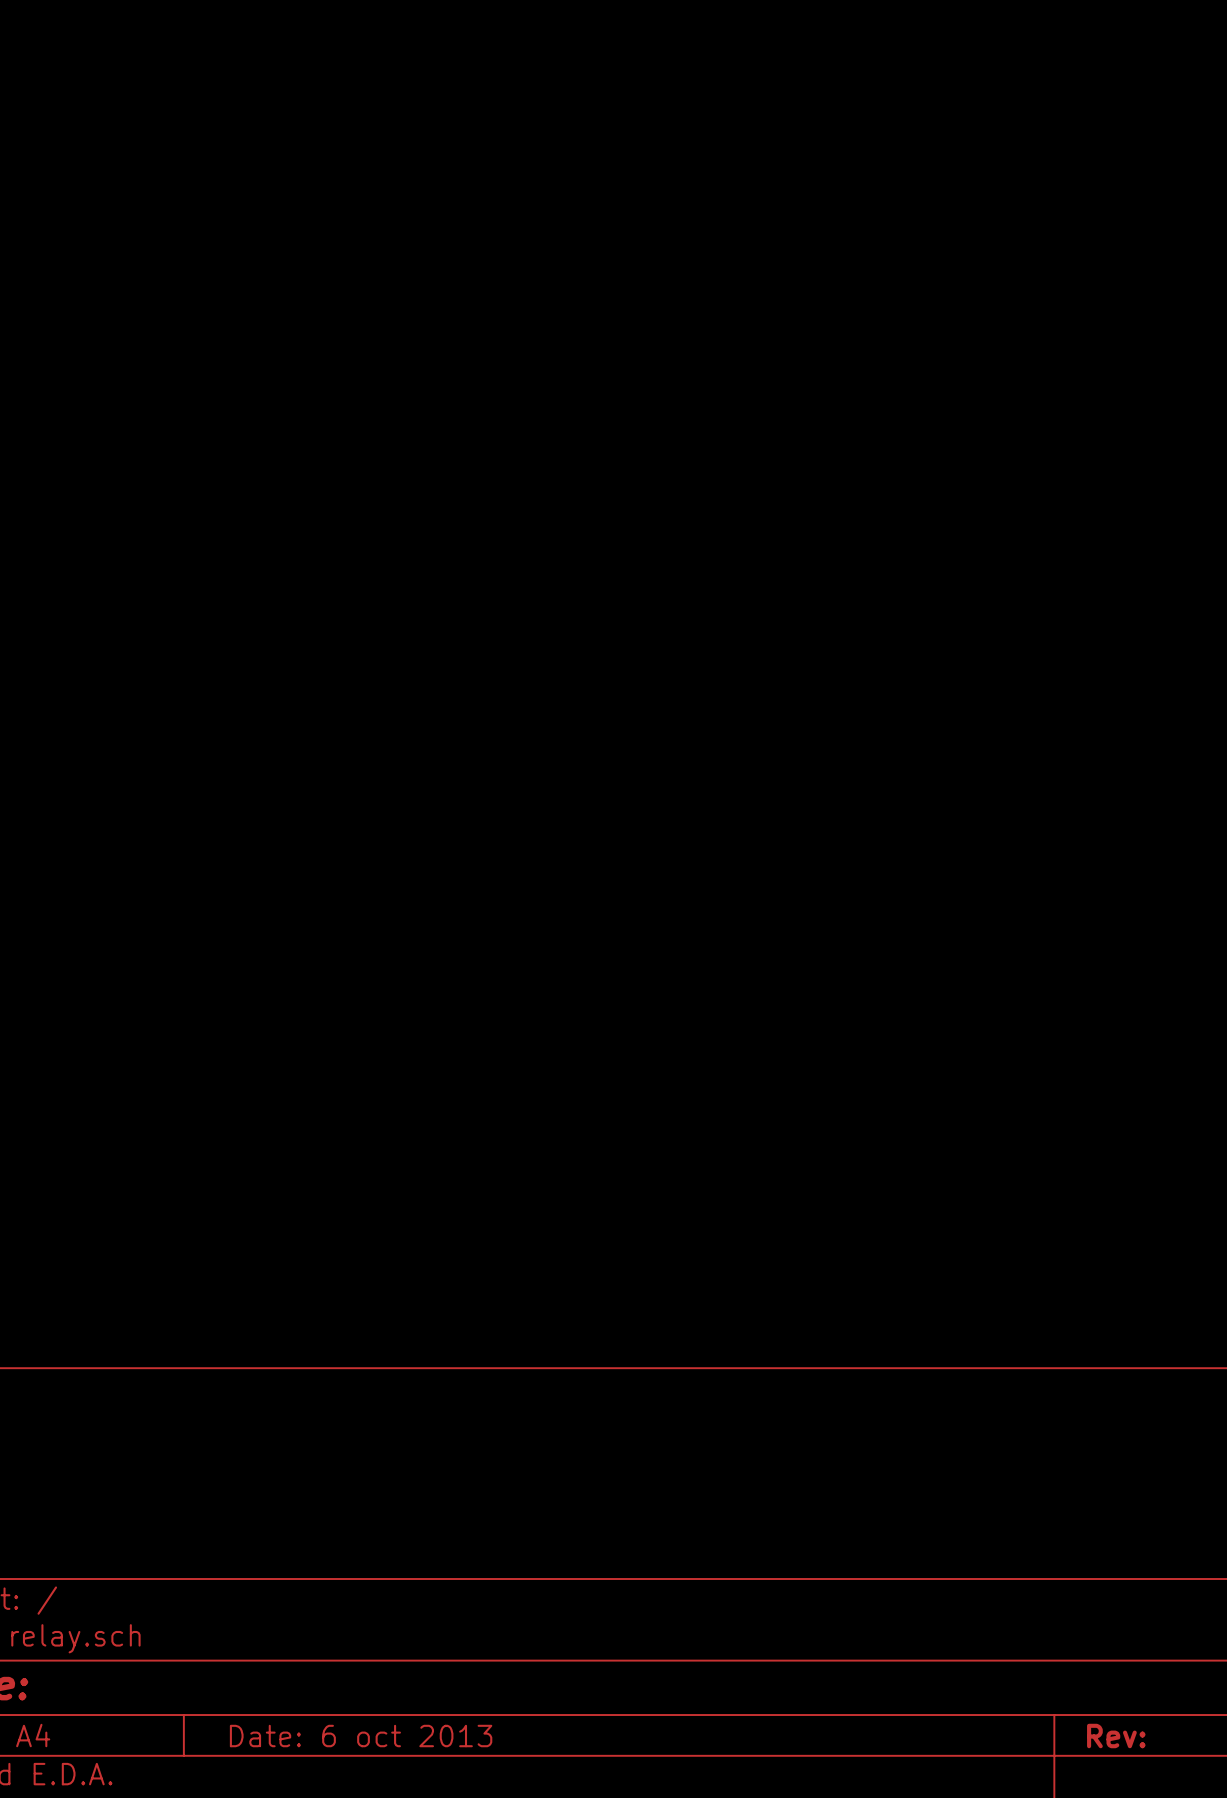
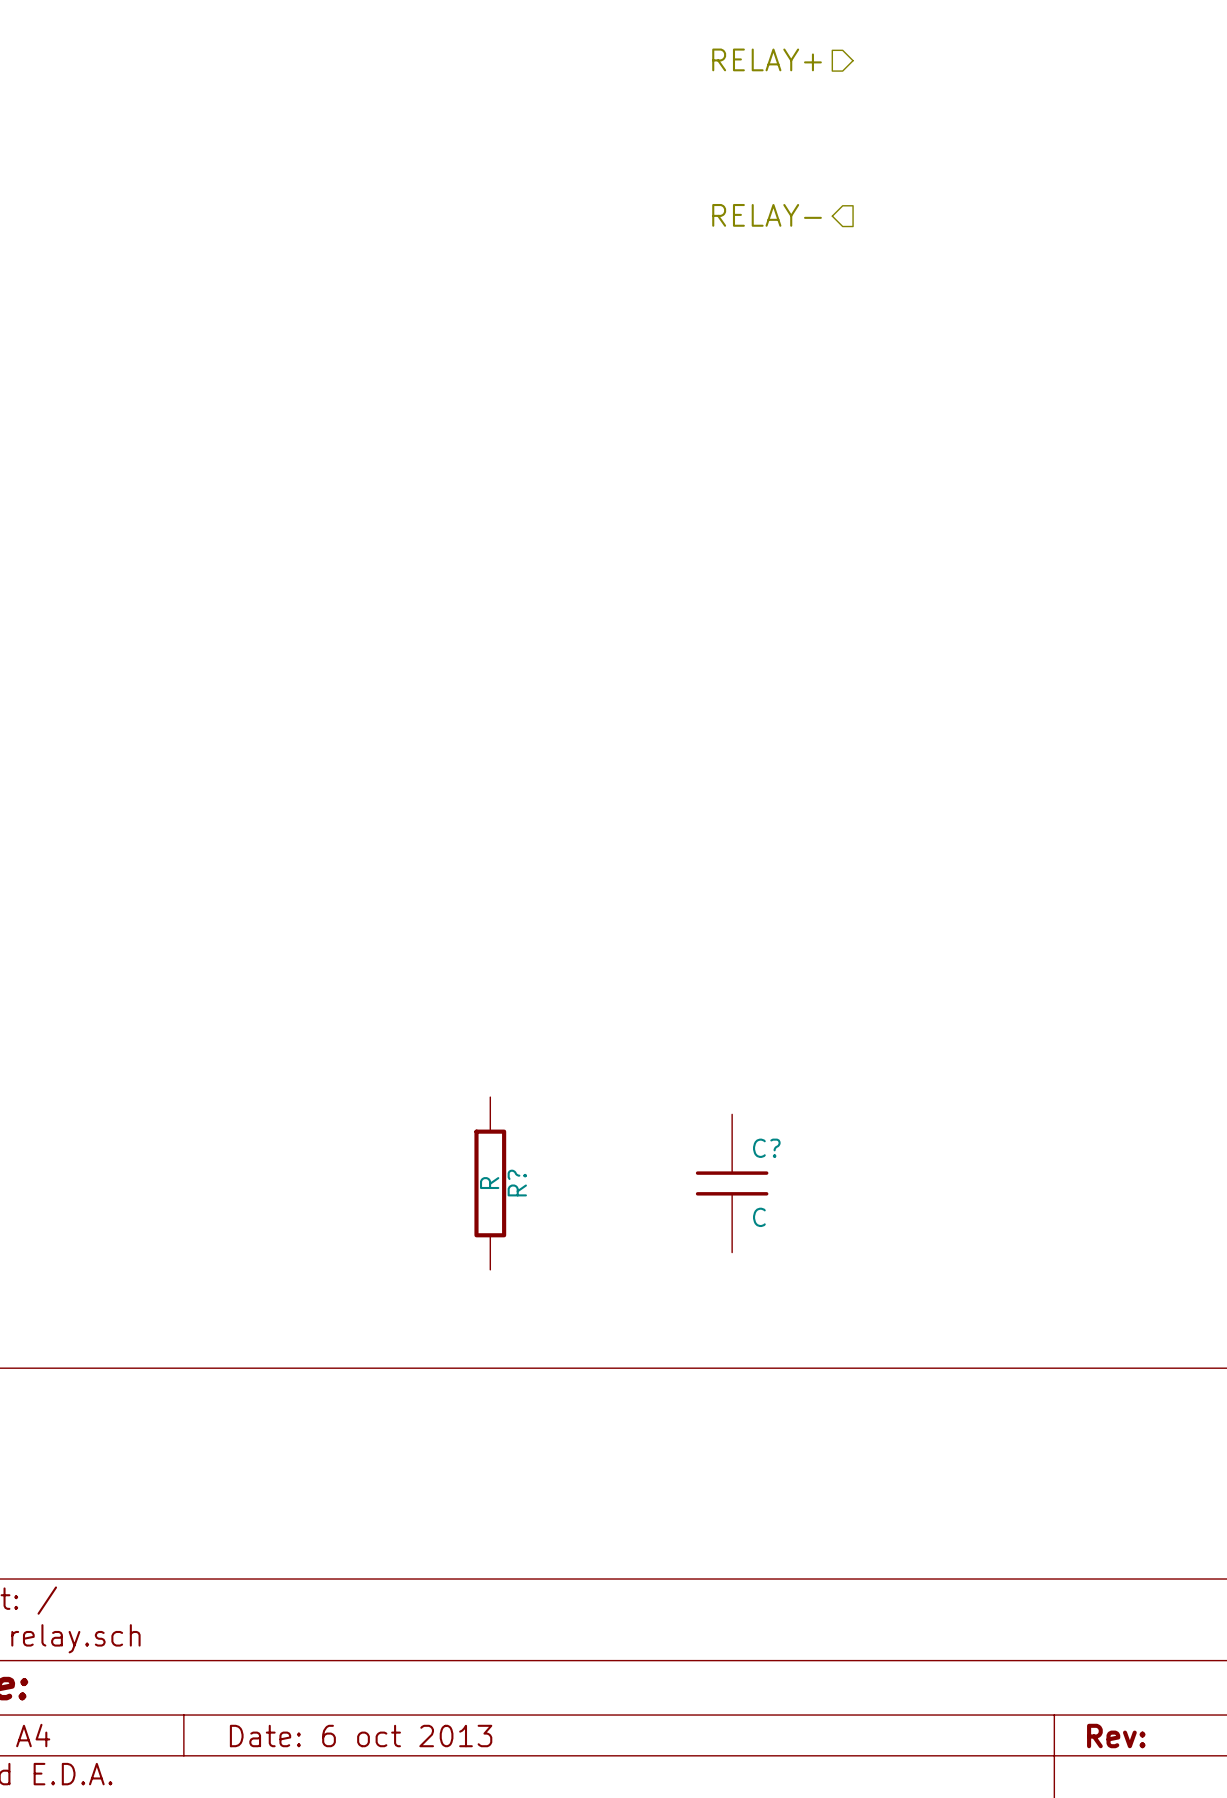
hierarchical label: none -> RELAY+ (767, 59)
hierarchical label: none -> RELAY- (767, 215)
R?: none -> R (490, 1183)
C?: none -> C (732, 1183)

